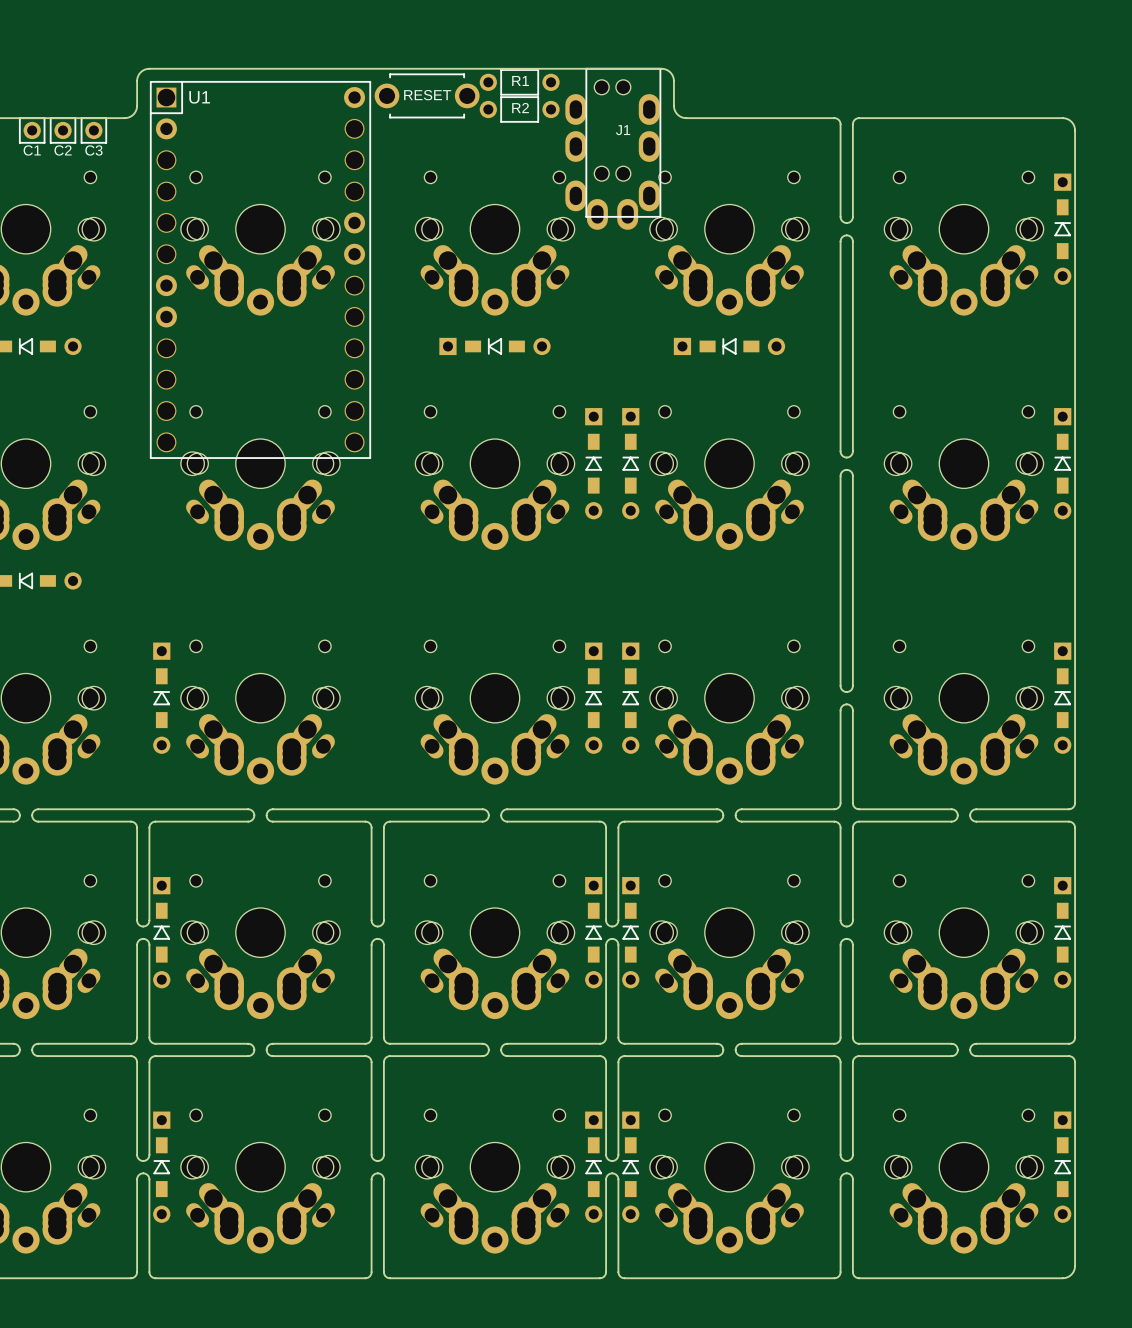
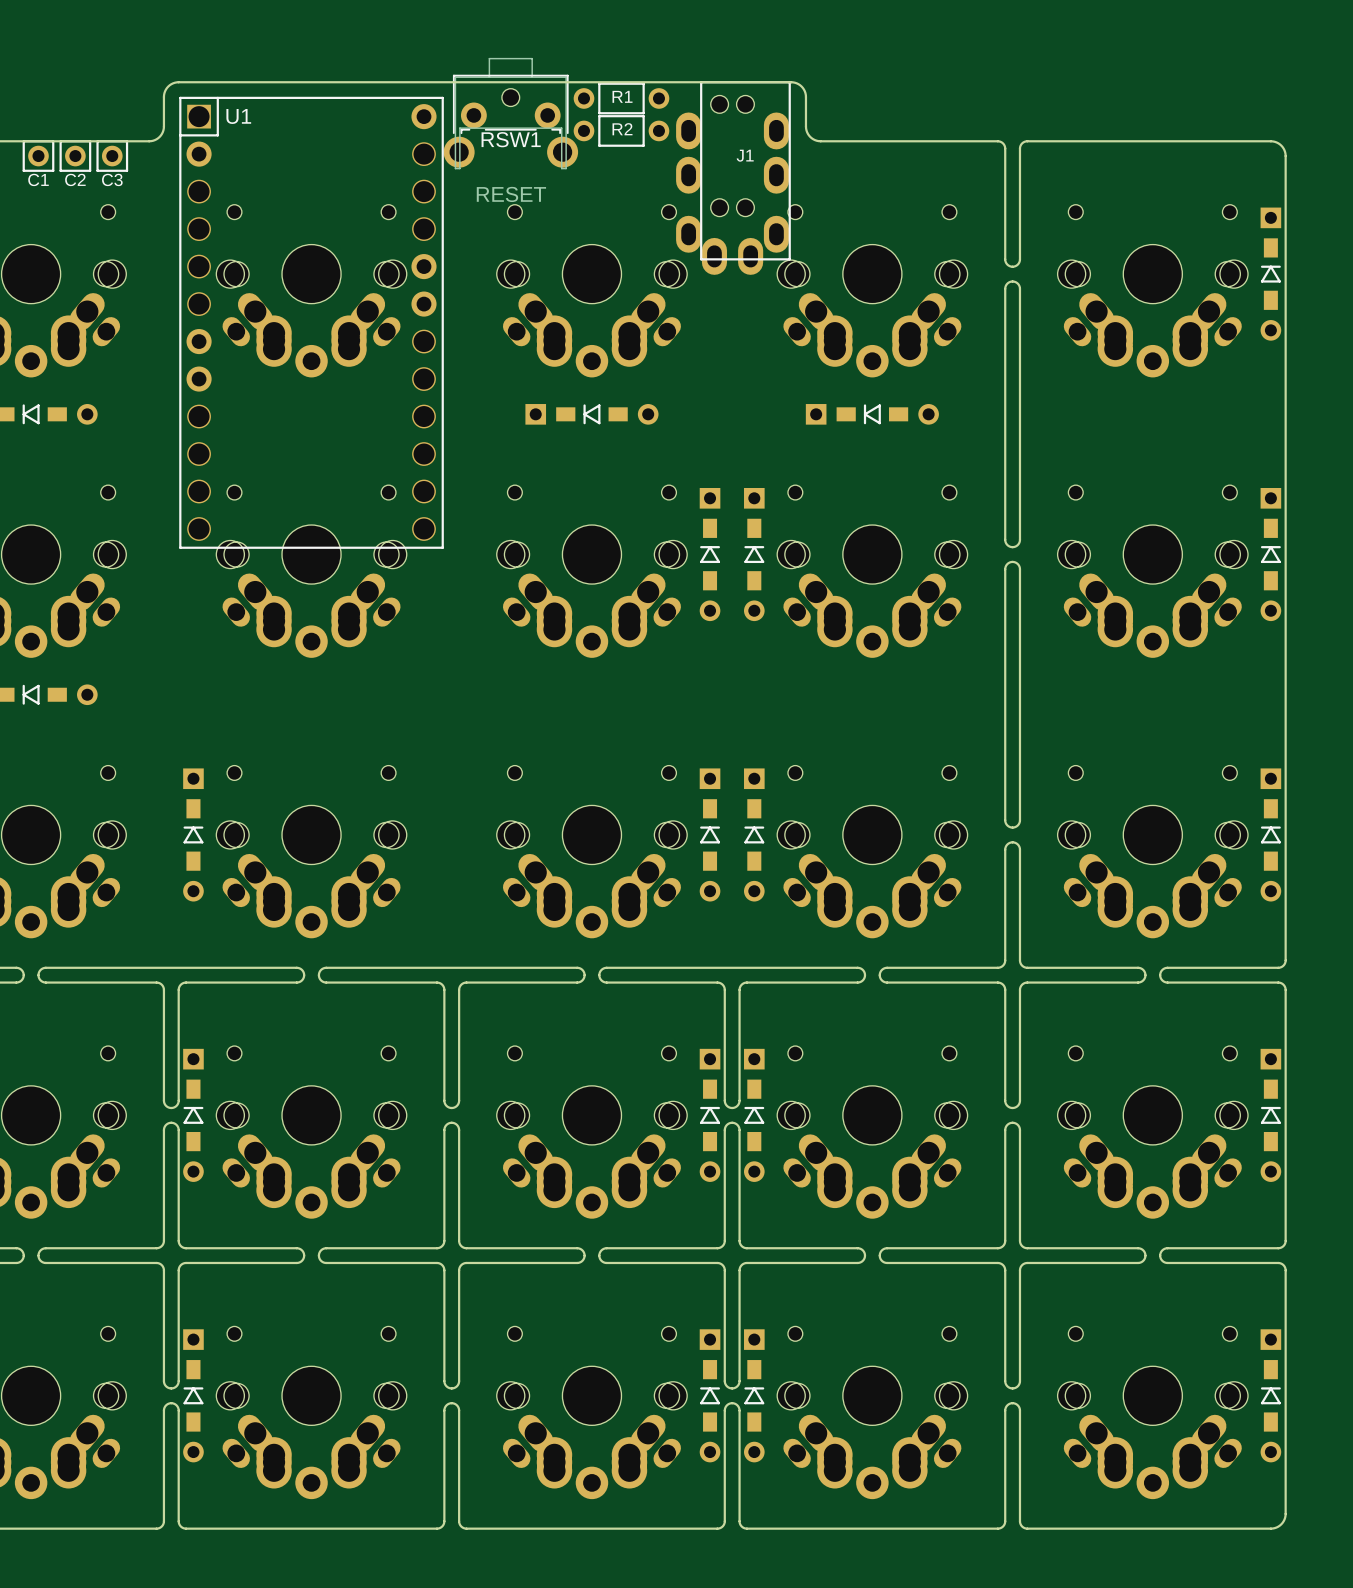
RSW1: none -> RESET (510, 113)
part: RESET (427, 95) -> none

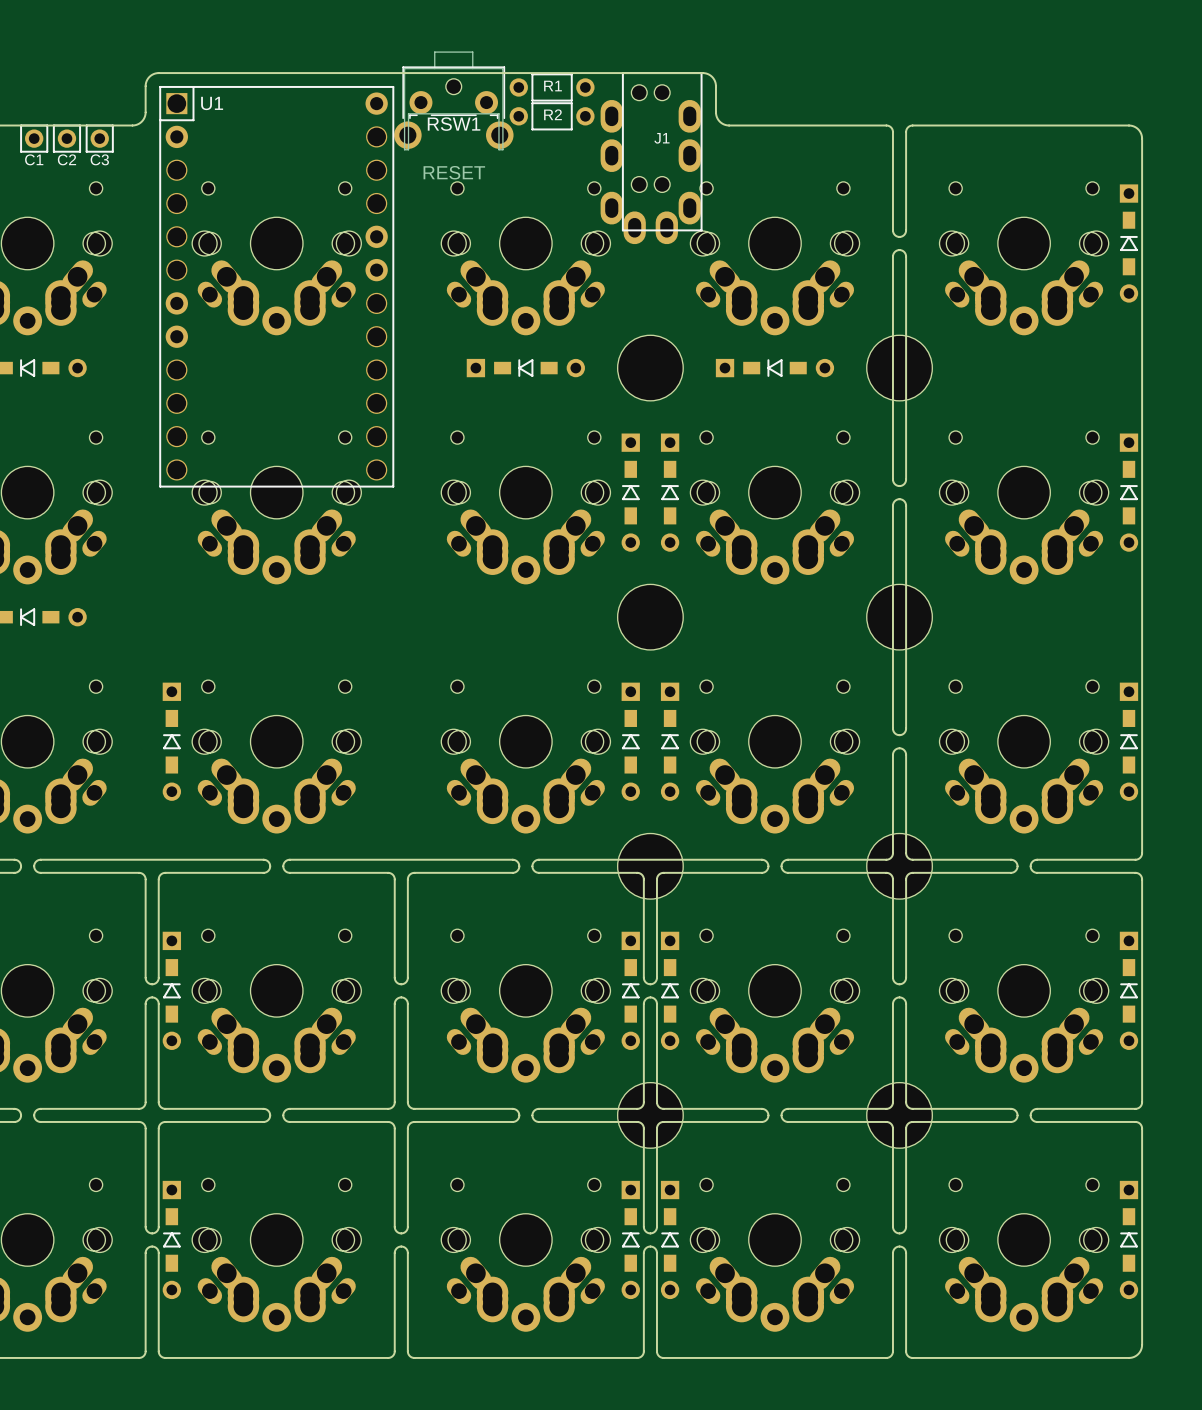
part: none -> (650, 368)
part: none -> (899, 368)
part: none -> (650, 617)
part: none -> (899, 617)
part: none -> (650, 866)
part: none -> (899, 866)
part: none -> (650, 1115)
part: none -> (899, 1115)

